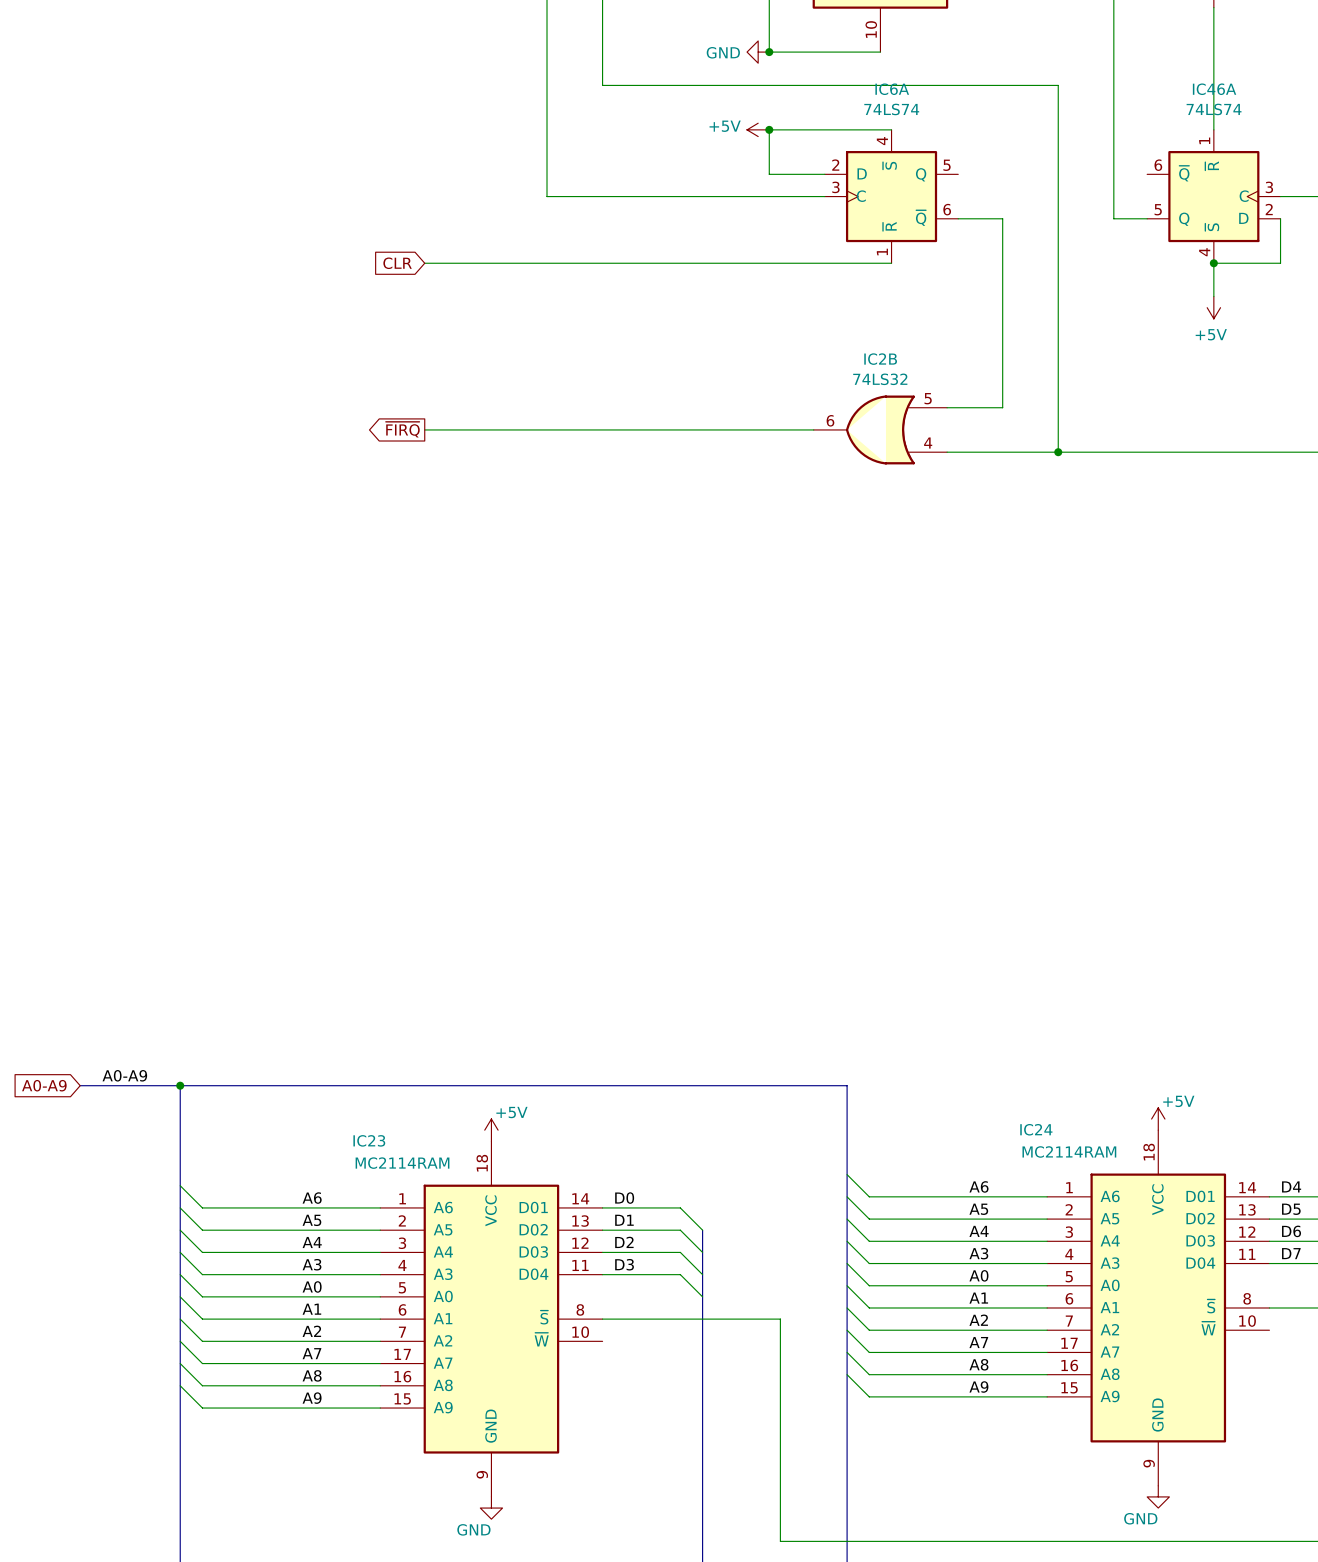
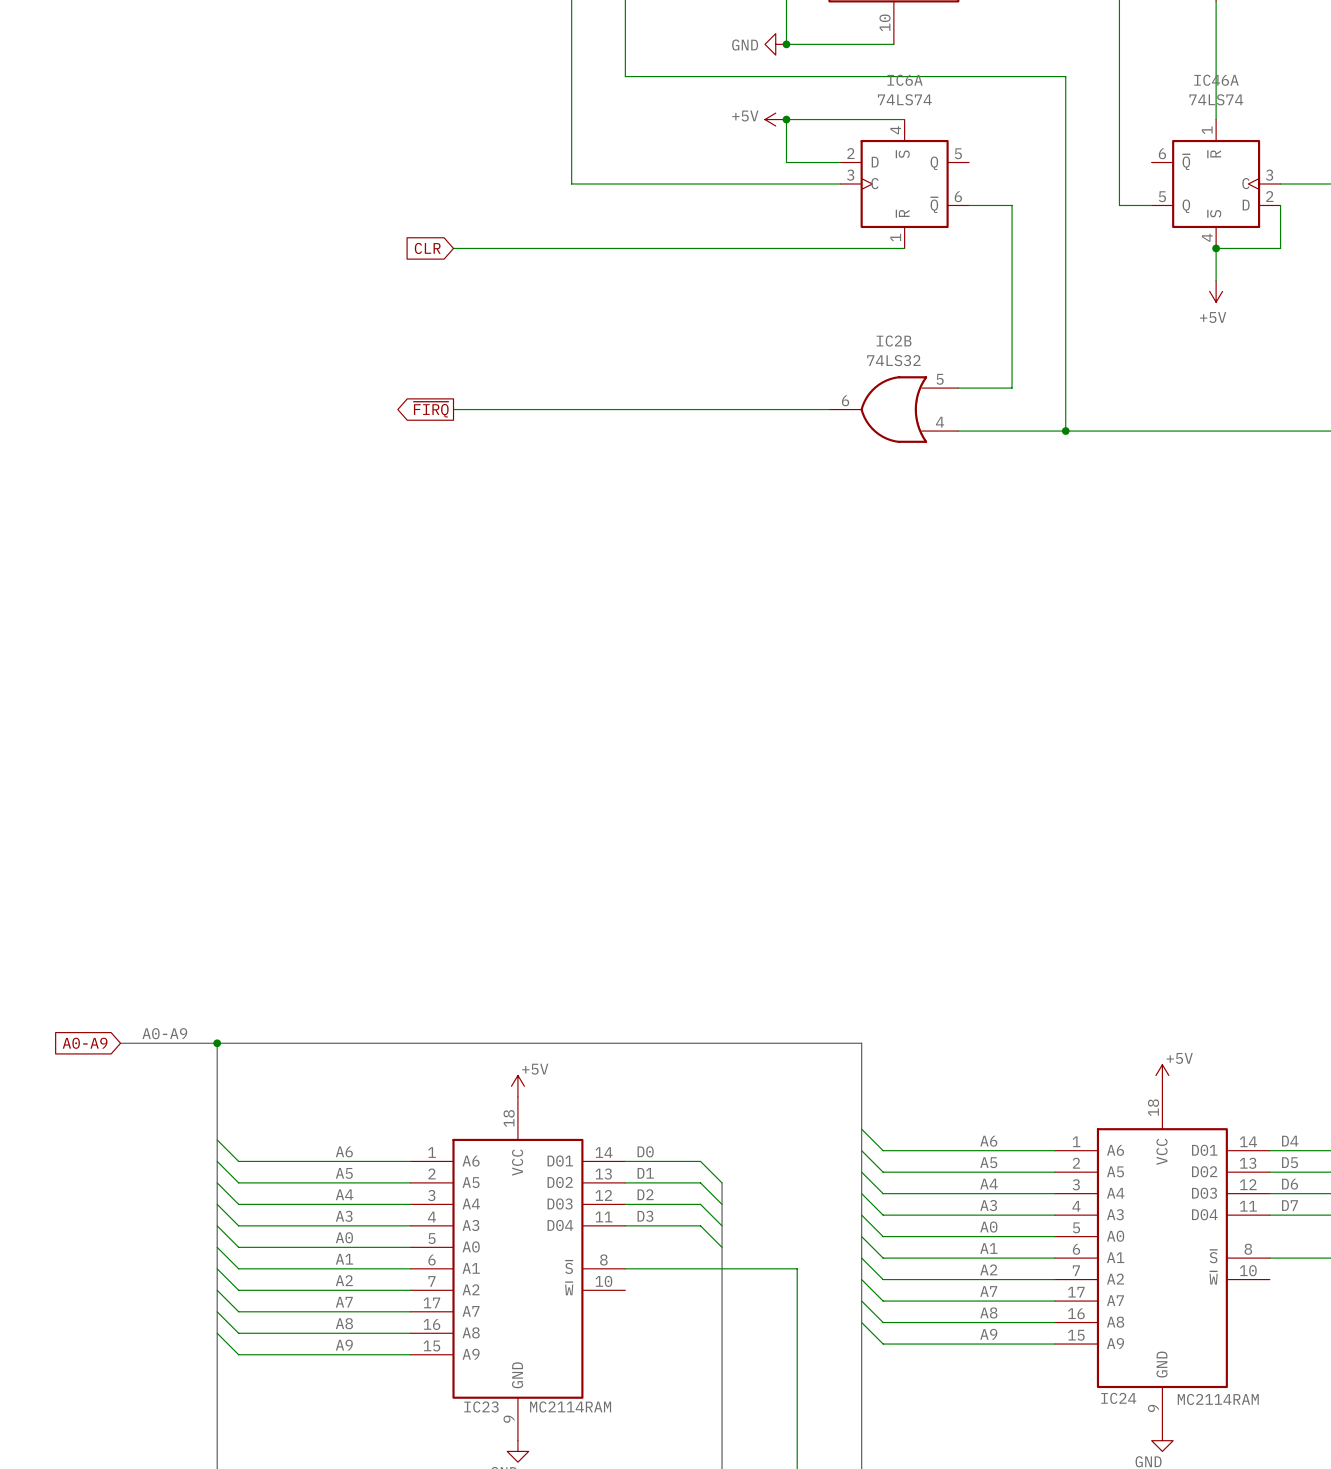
IC24 name position: IC24 (1036, 1129) -> IC24 (1118, 1398)
IC23 name position: IC23 (369, 1140) -> IC23 (481, 1406)
IC24 value position: MC2114RAM (1069, 1151) -> MC2114RAM (1218, 1399)
IC23 value position: MC2114RAM (402, 1163) -> MC2114RAM (570, 1406)

